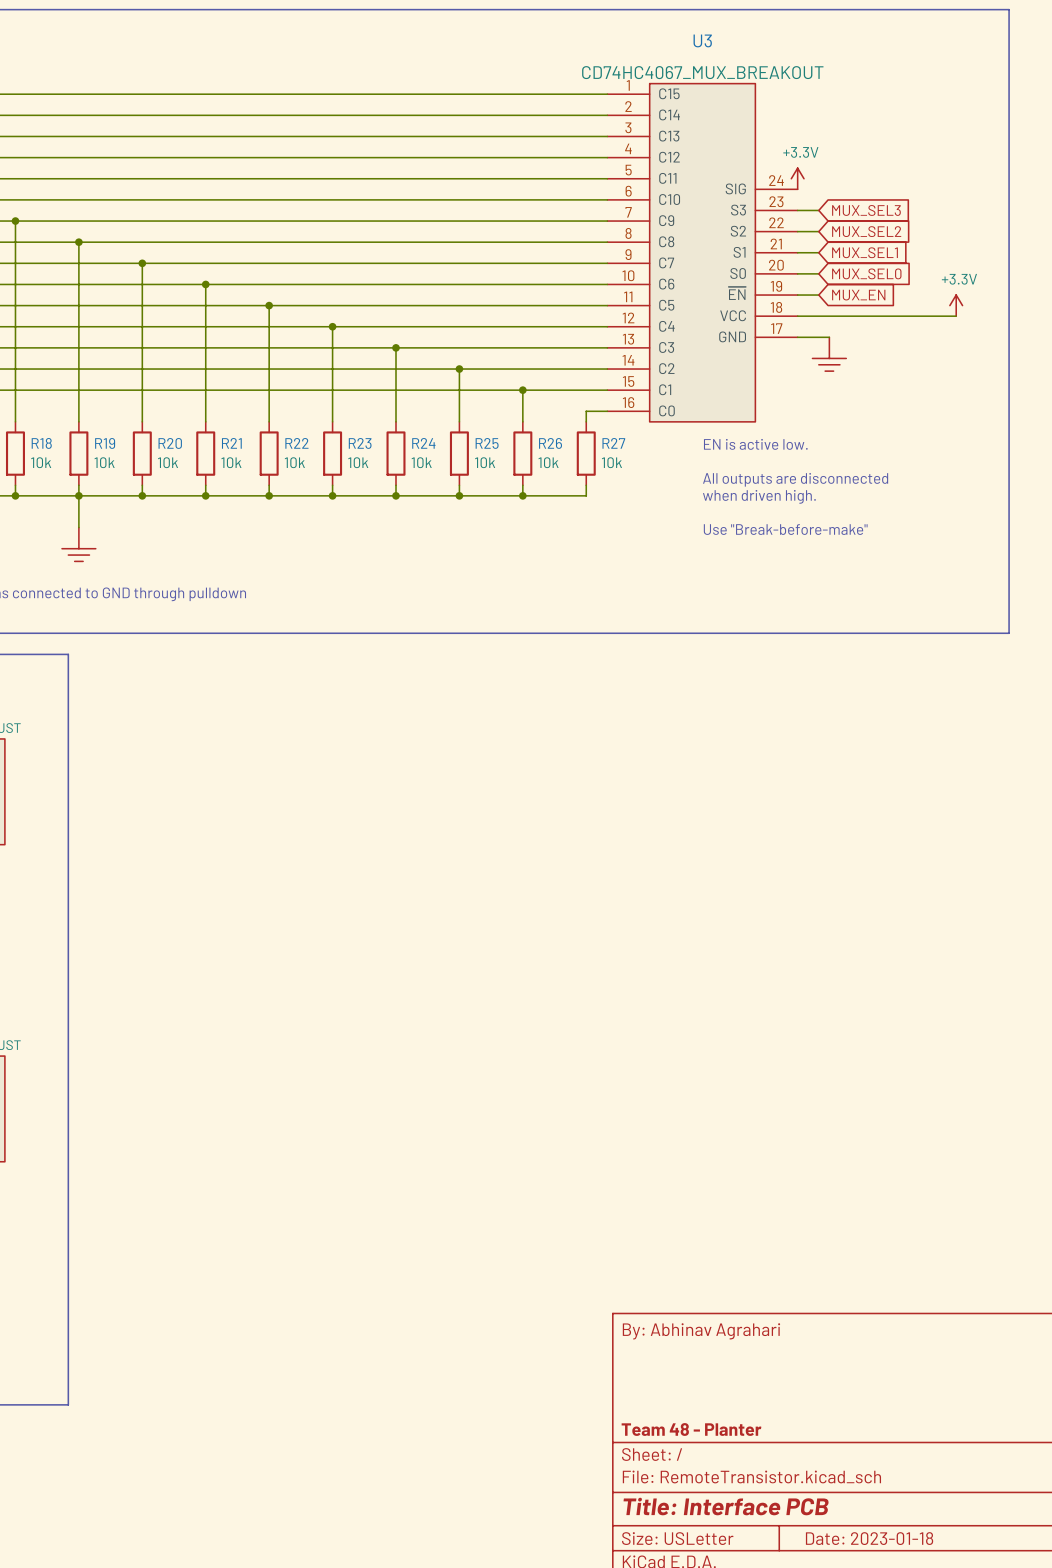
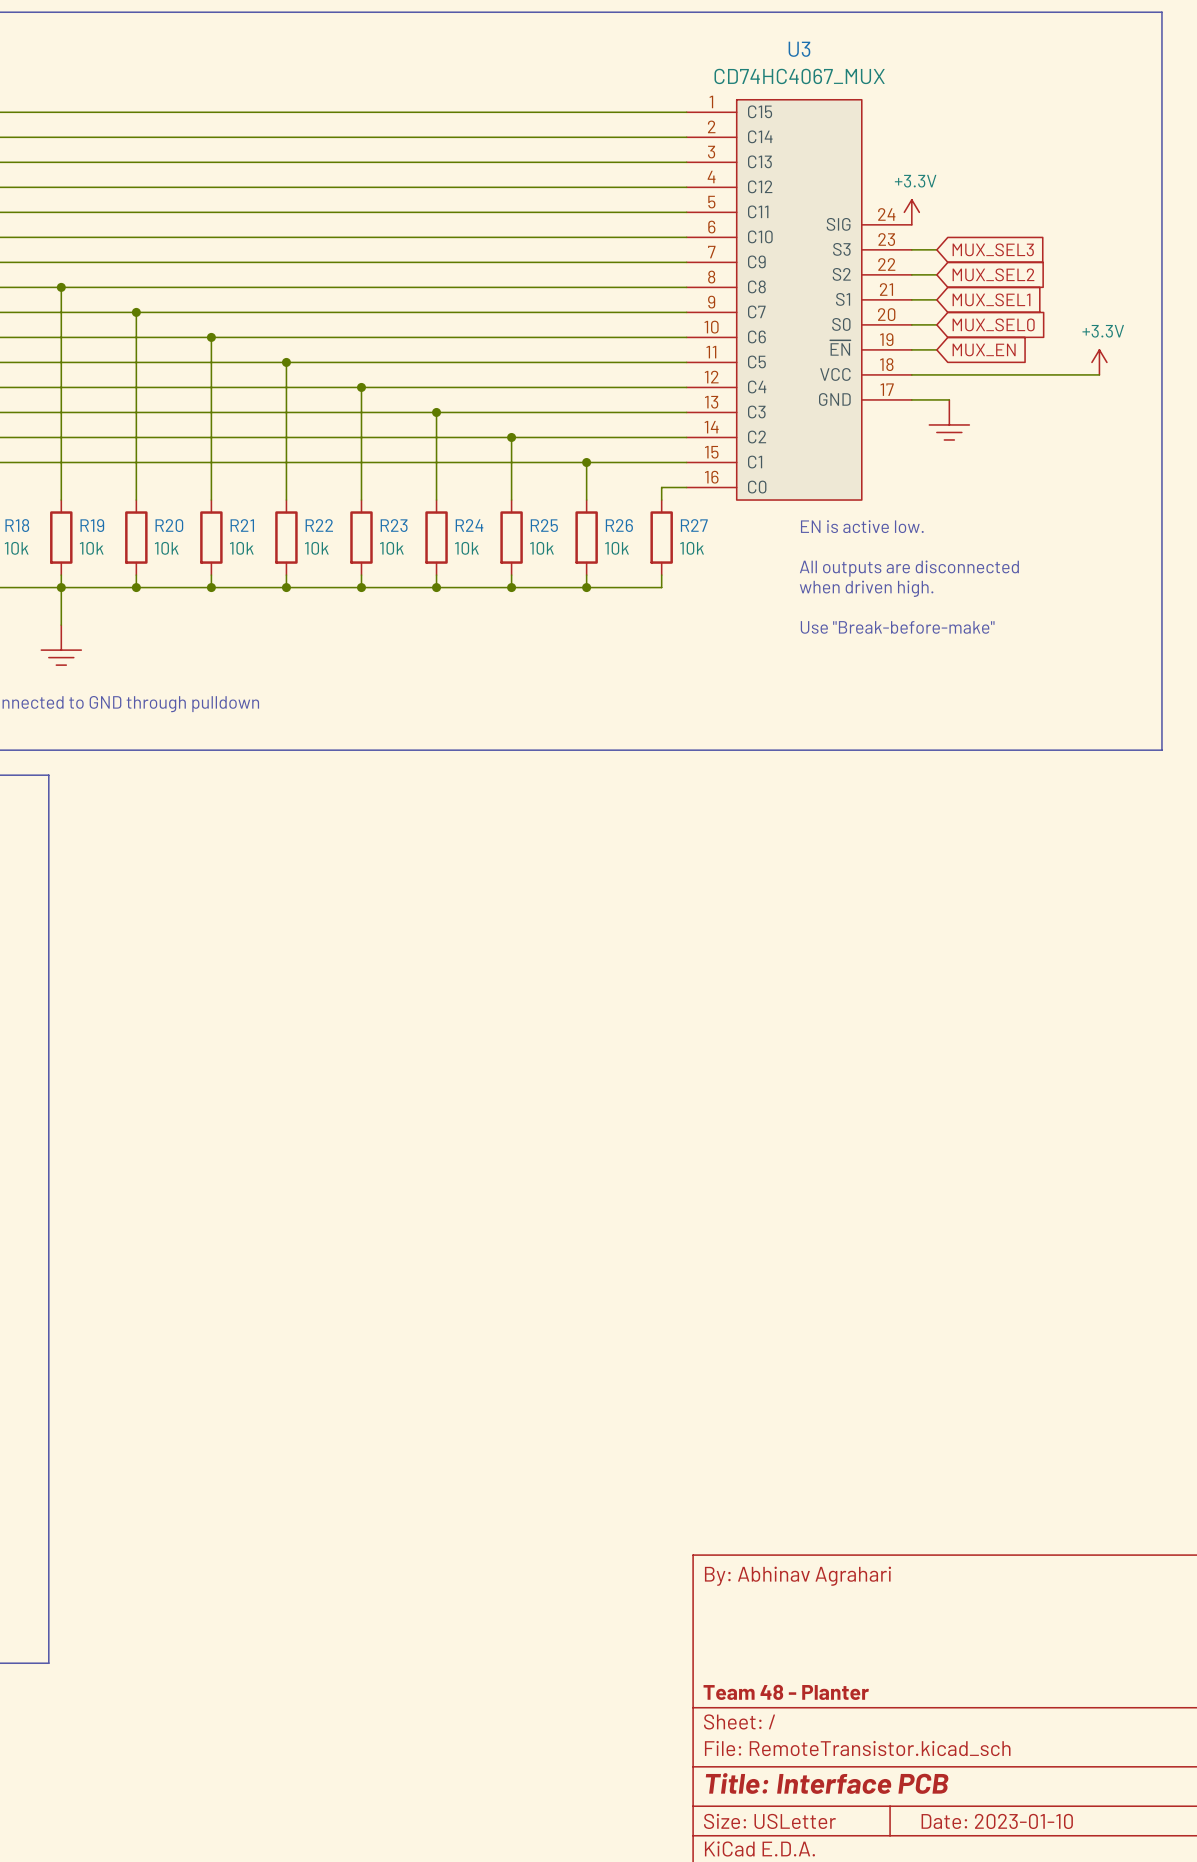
U3 value: CD74HC4067_MUX_BREAKOUT (702, 72) -> CD74HC4067_MUX (799, 76)
title block: Date: 2023-01-18 (869, 1538) -> Date: 2023-01-10 (997, 1821)

